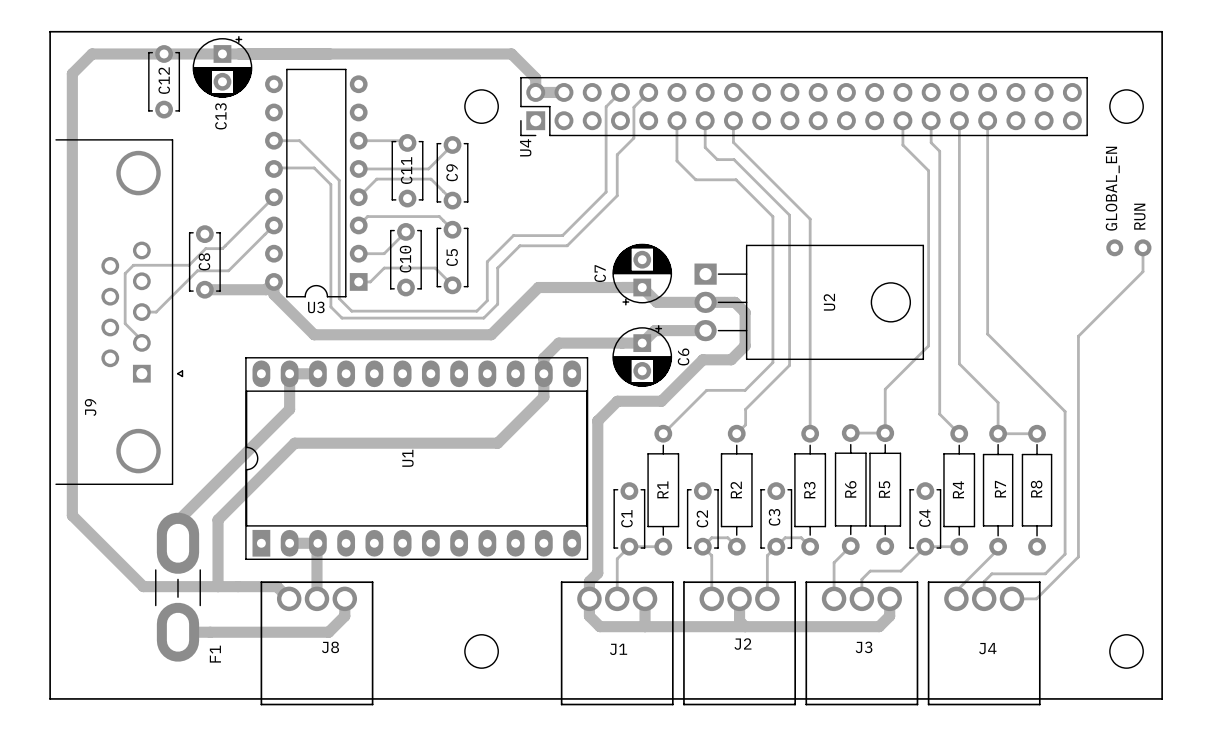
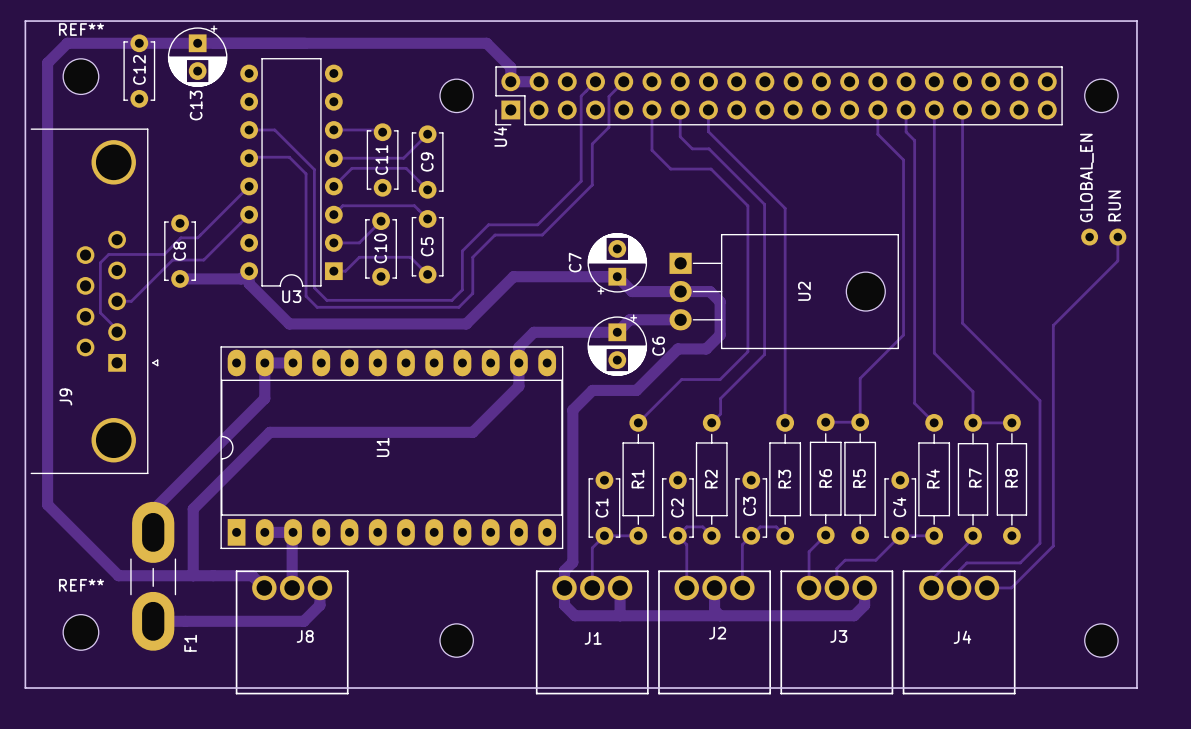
REF**: none -> (80, 76)
REF**: none -> (80, 632)

